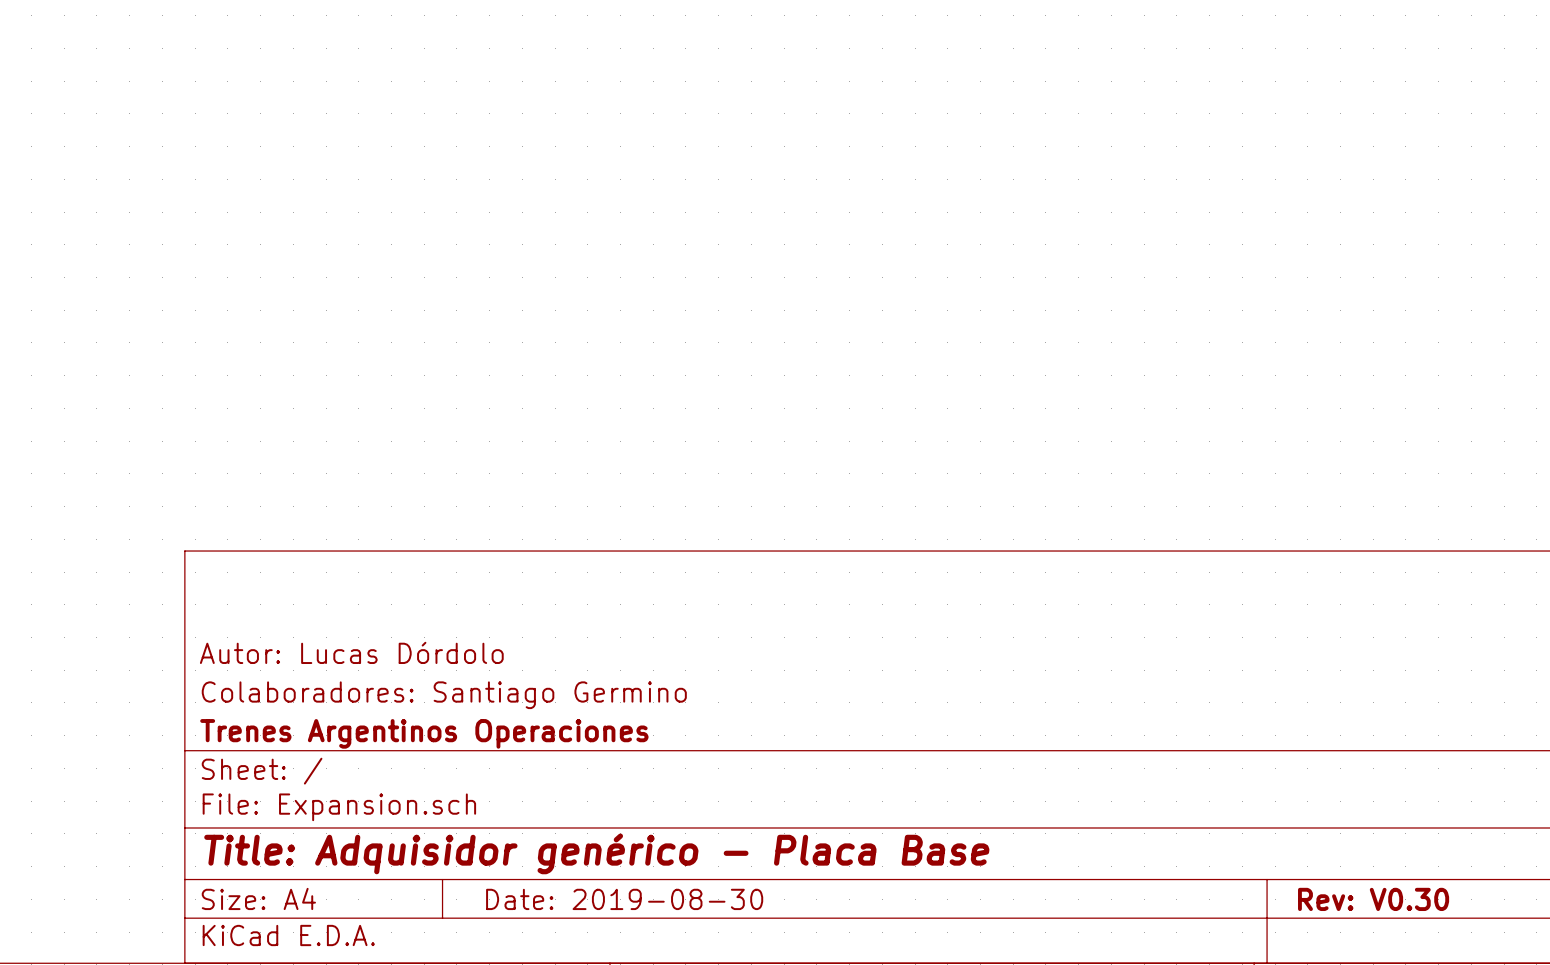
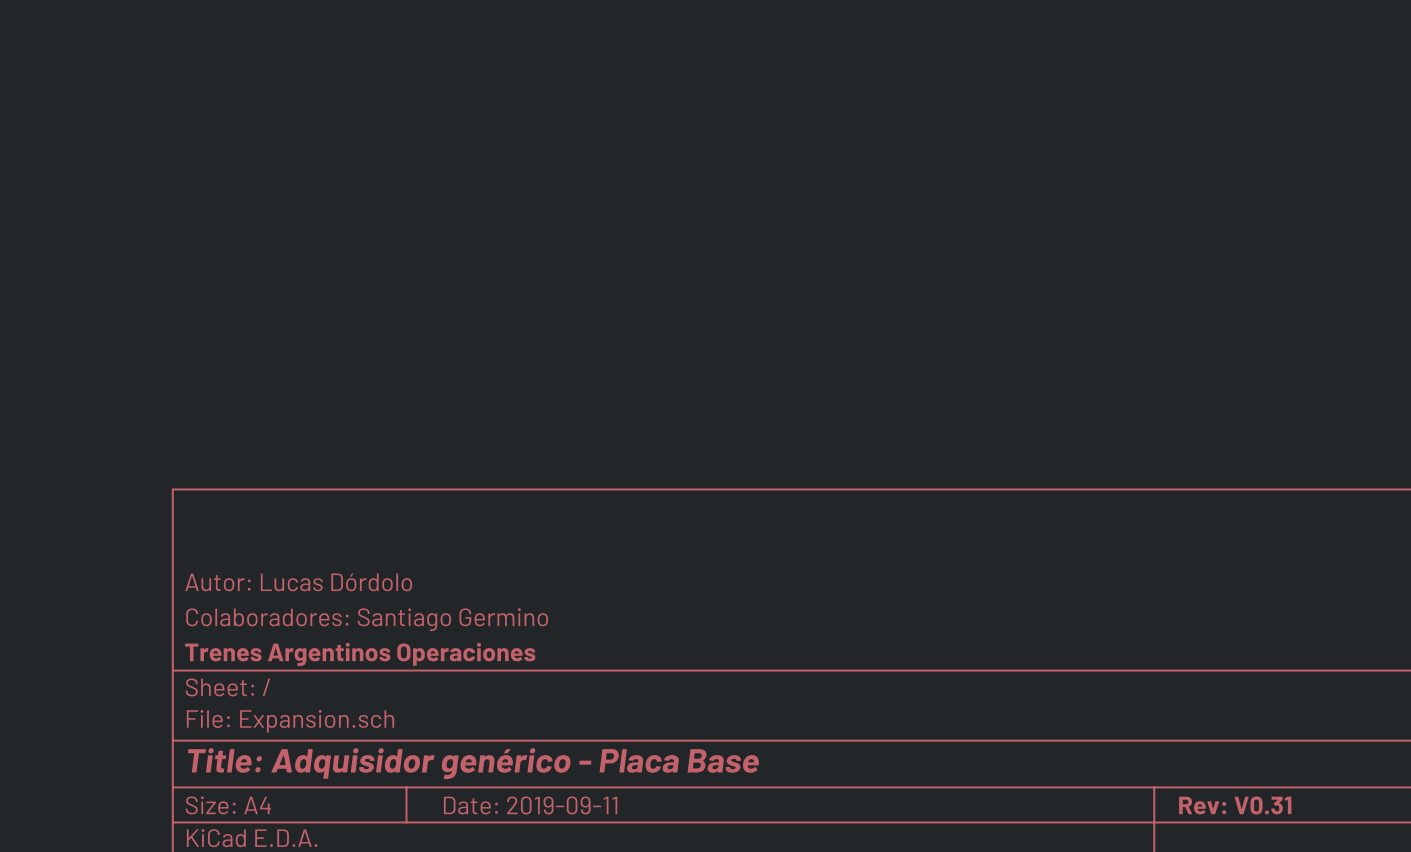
title block: Date: 2019-08-30 (624, 899) -> Date: 2019-09-11 (530, 805)
title block: Rev: V0.30 (1373, 899) -> Rev: V0.31 (1235, 805)

